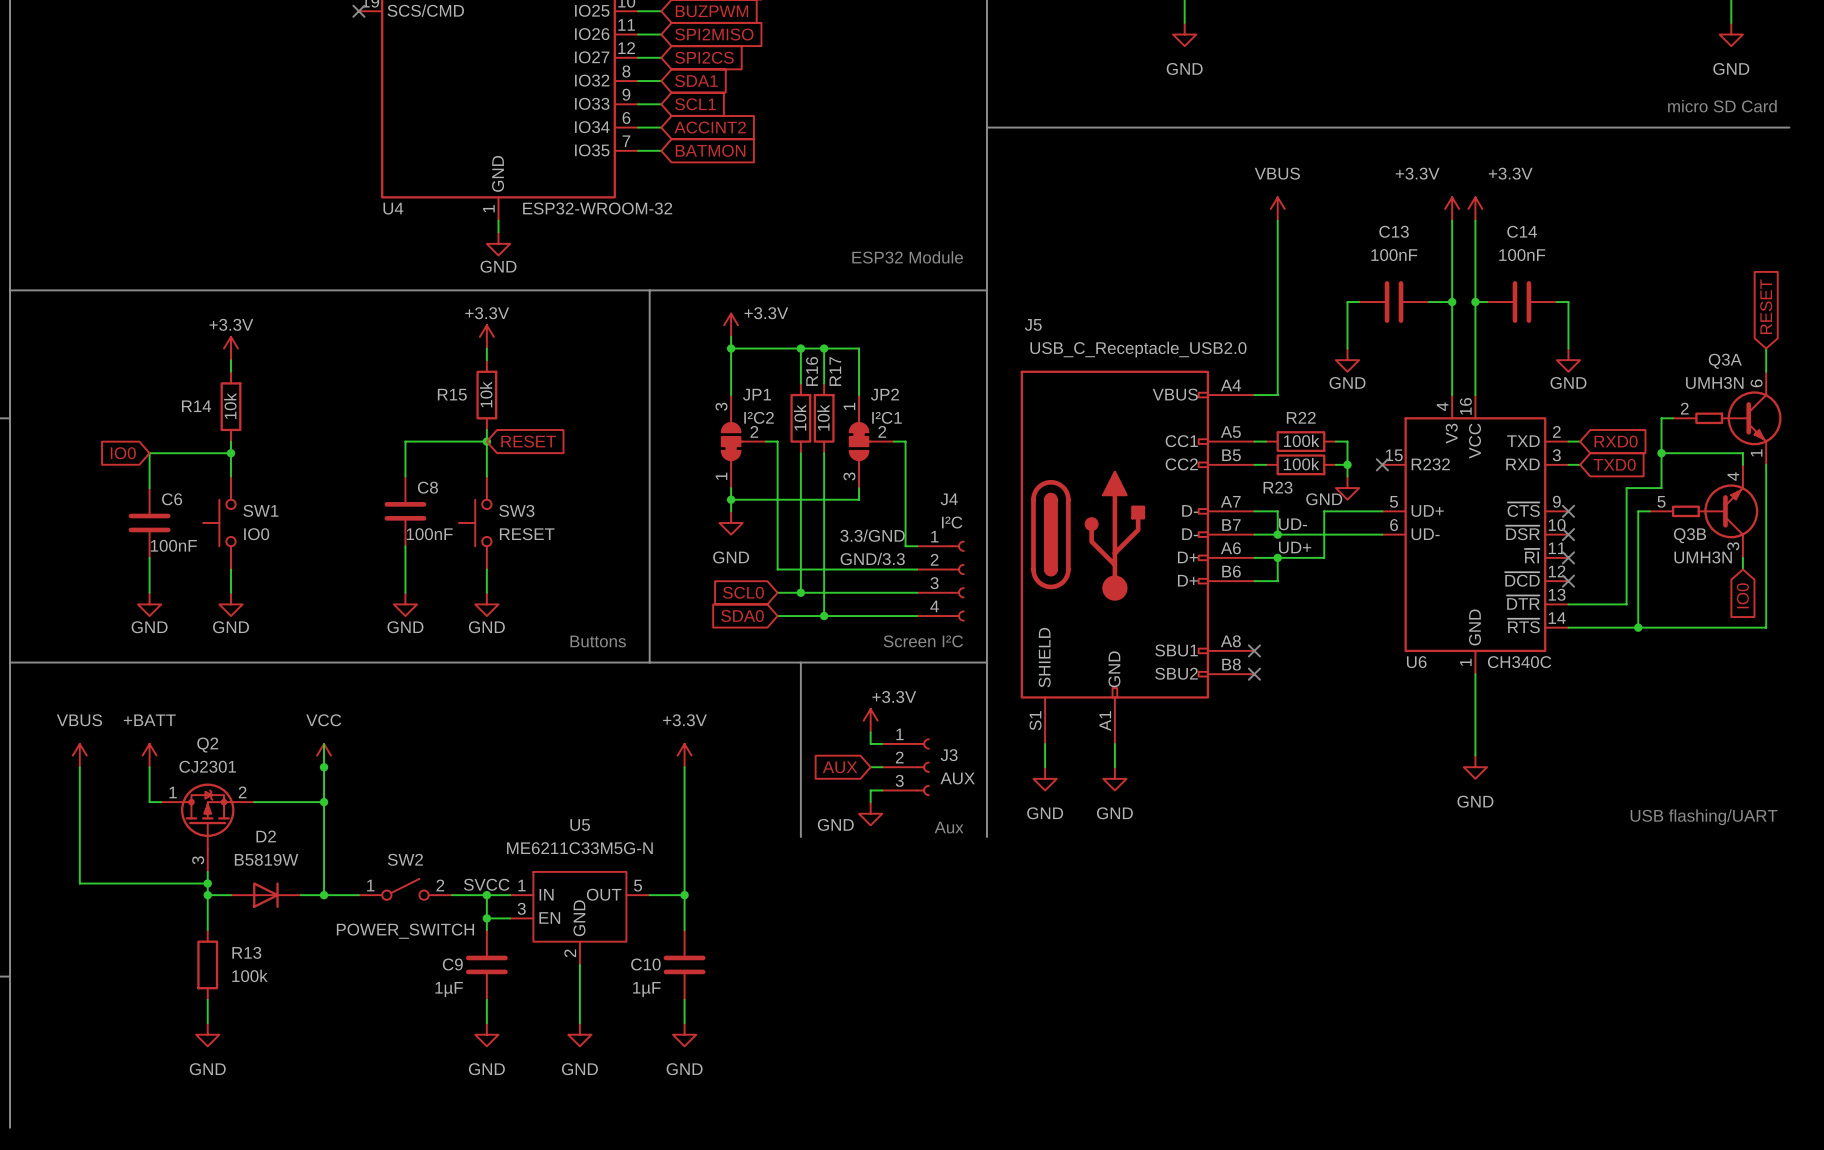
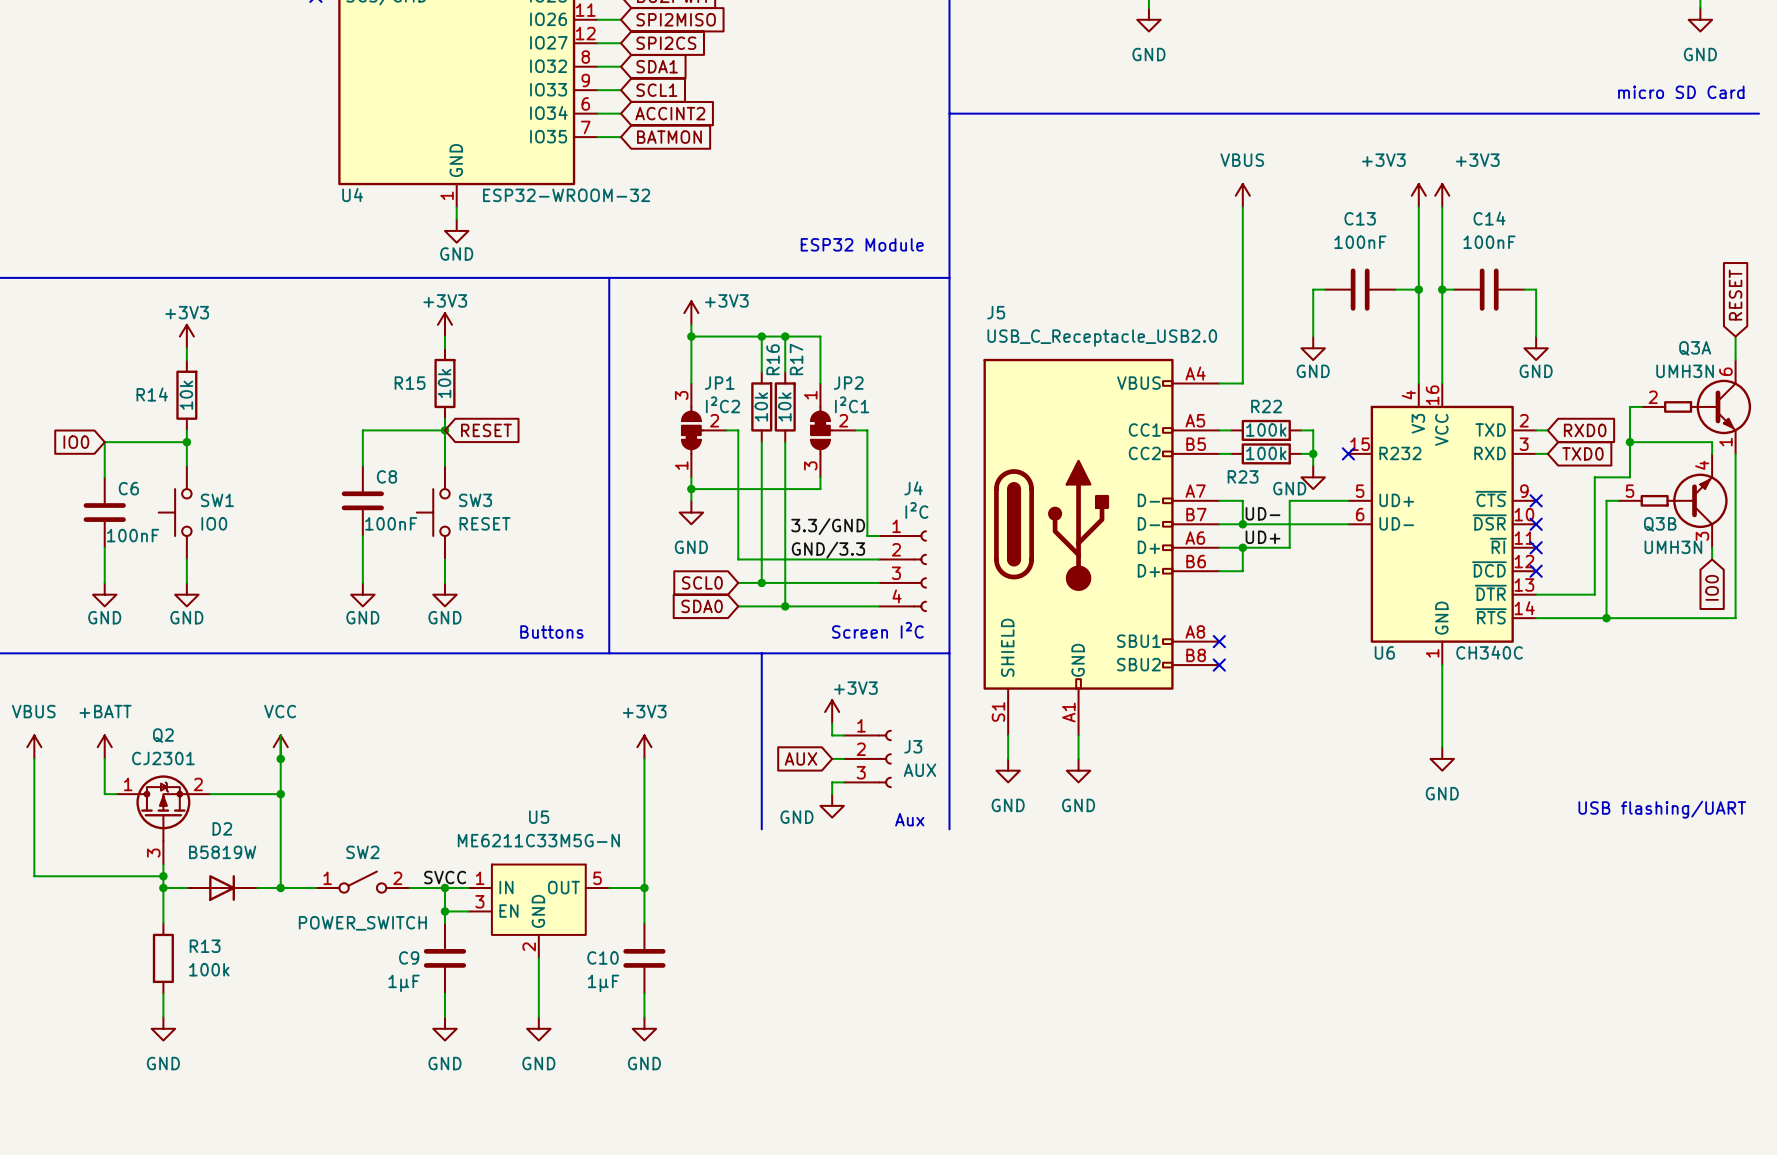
power symbol: +3.3V (1452, 208) -> +3V3 (1418, 195)
power symbol: +3.3V (1475, 208) -> +3V3 (1442, 195)
power symbol: +3.3V (731, 325) -> +3V3 (691, 313)
power symbol: +3.3V (486, 336) -> +3V3 (444, 324)
power symbol: +3.3V (231, 348) -> +3V3 (186, 336)
power symbol: +3.3V (870, 720) -> +3V3 (832, 712)
power symbol: +3.3V (684, 755) -> +3V3 (644, 747)

